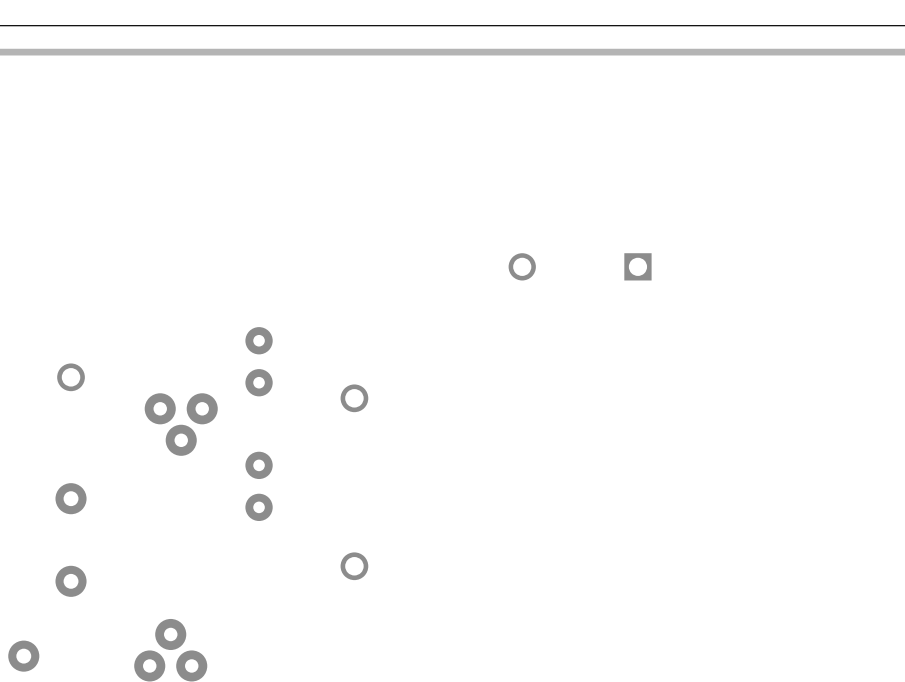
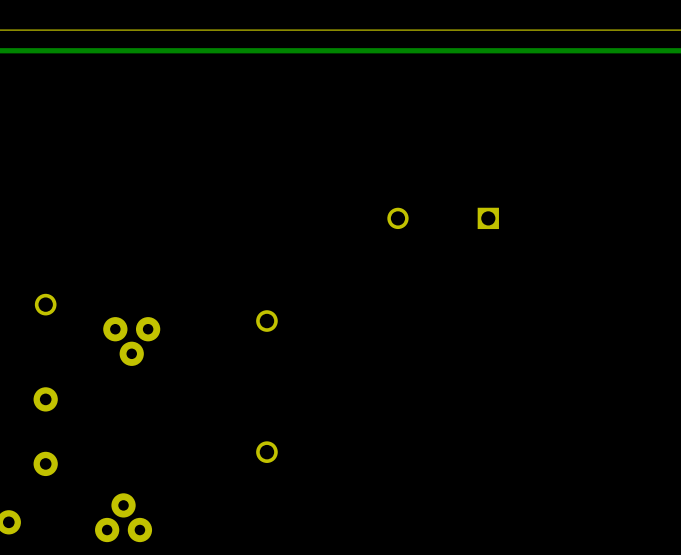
part: (259, 361) -> none
part: (259, 486) -> none

